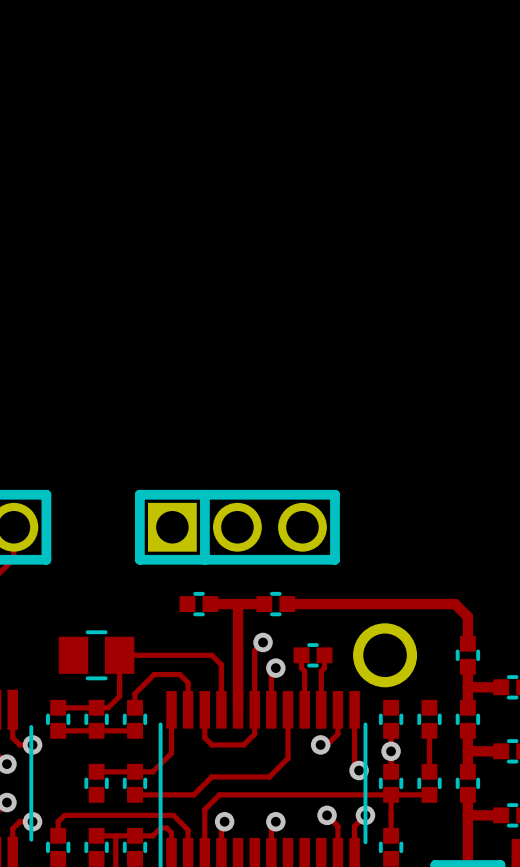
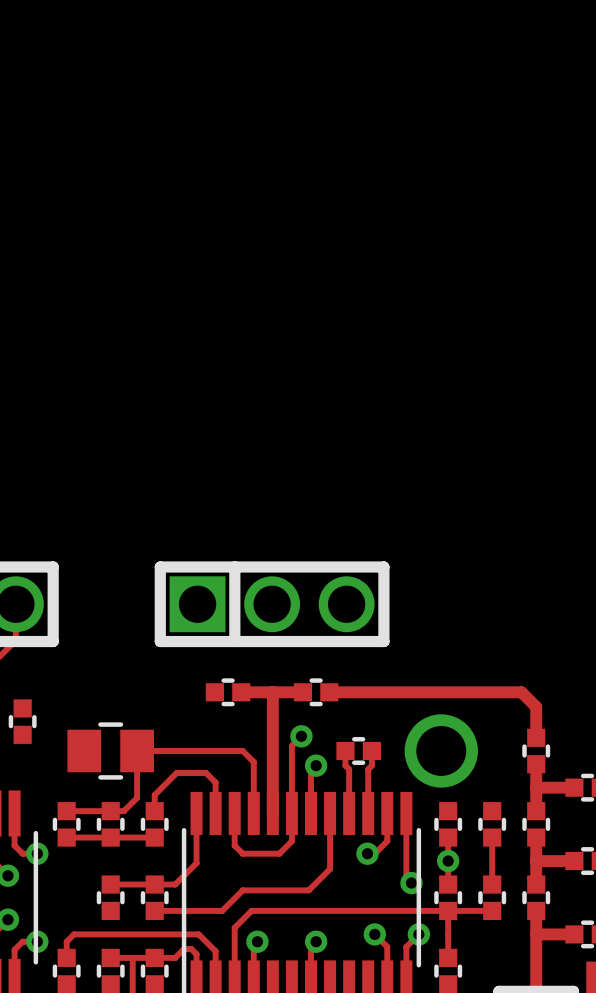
part: none -> (22, 721)

